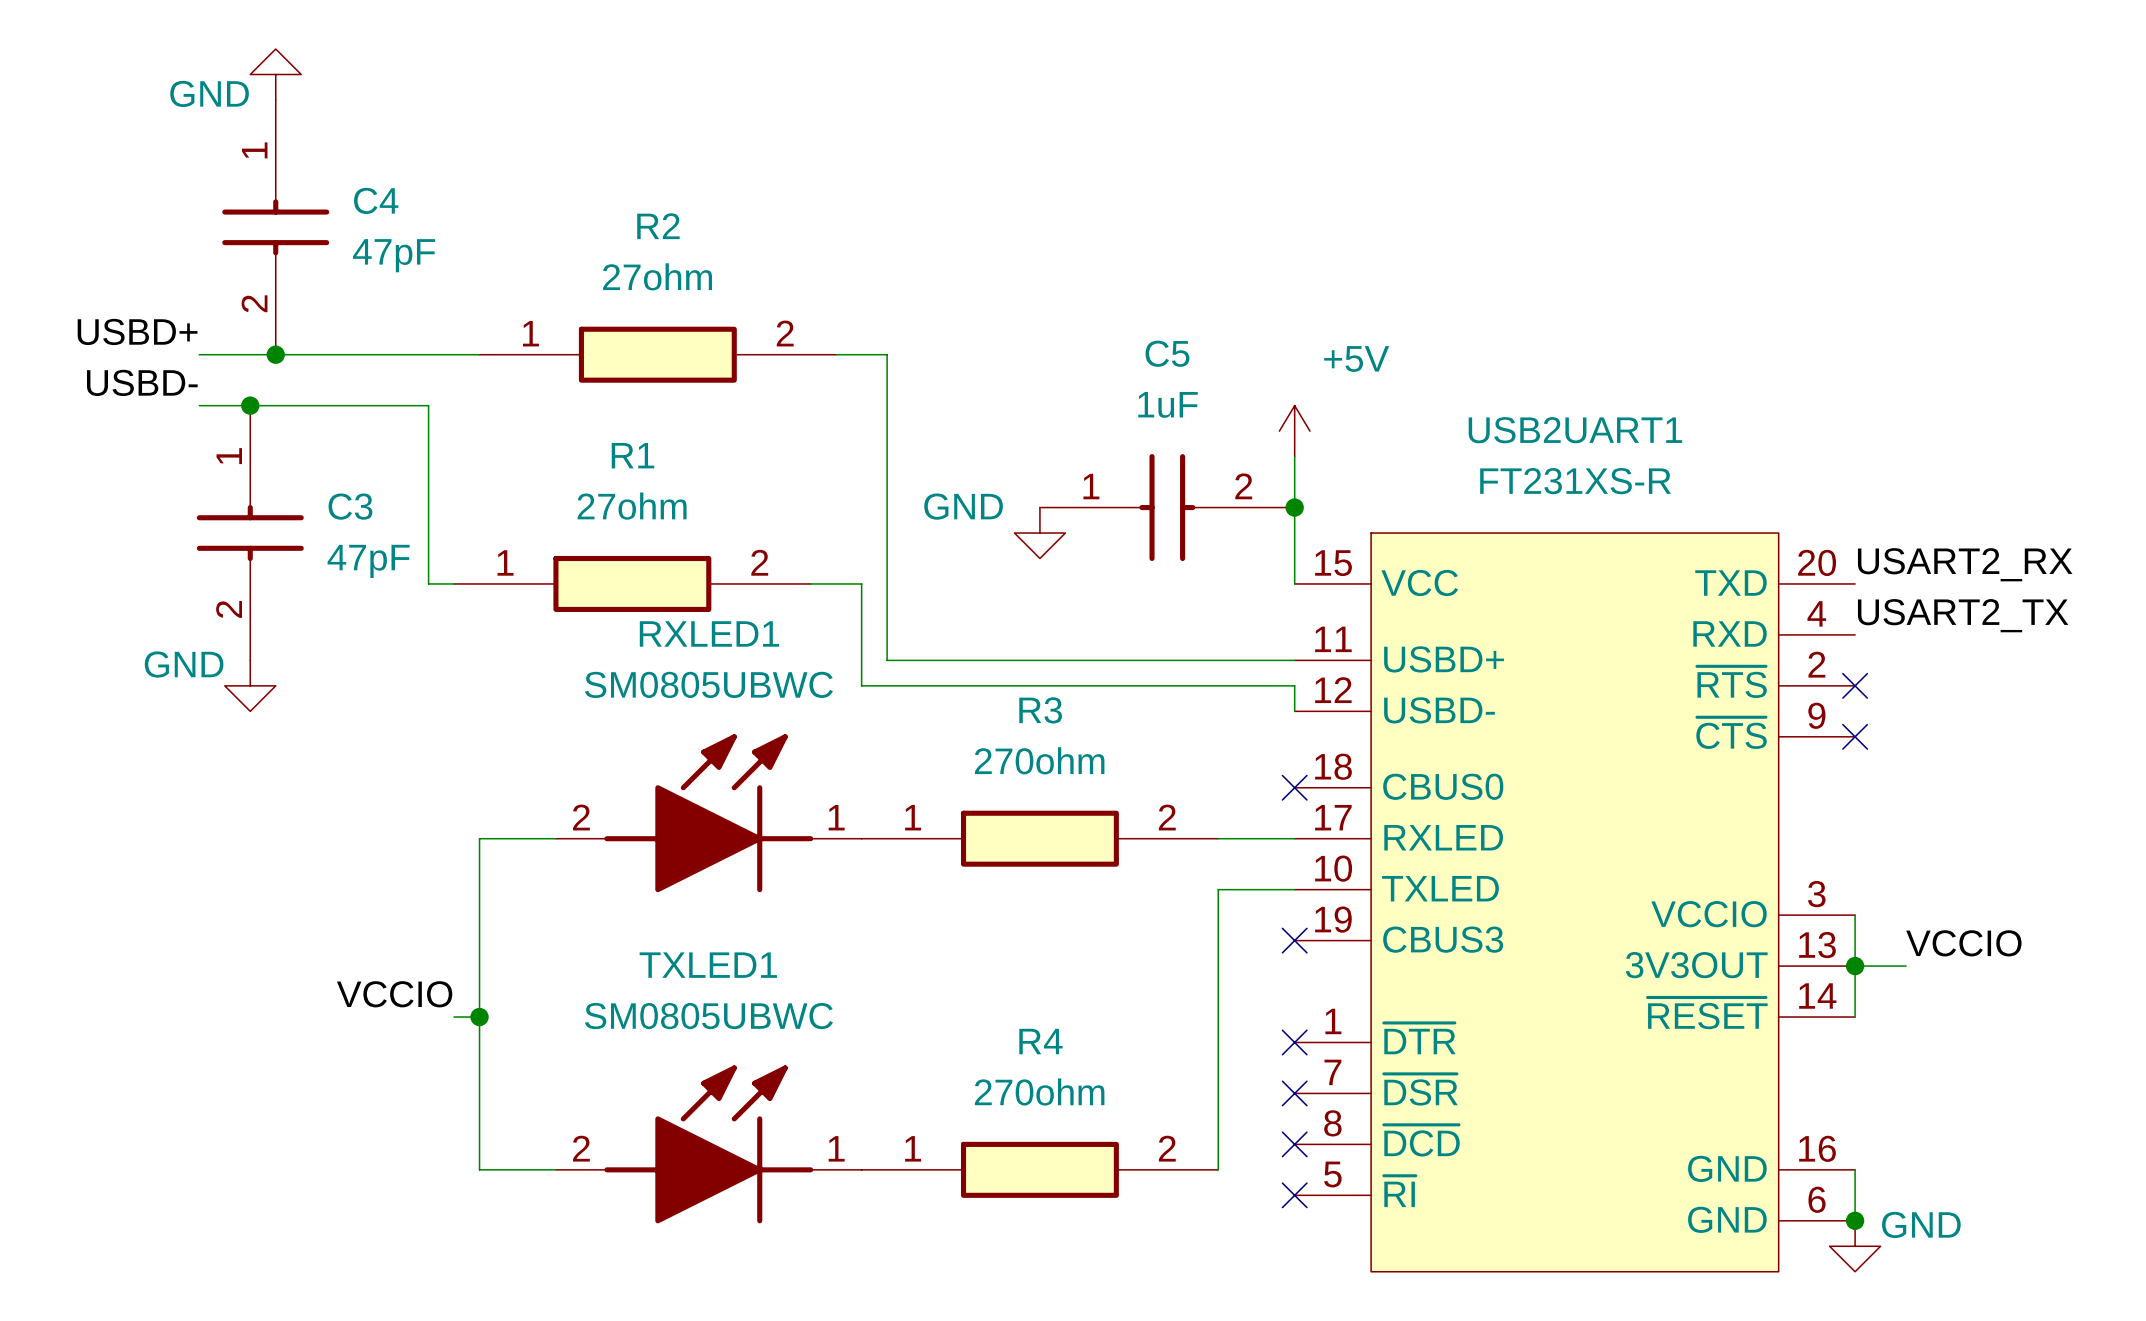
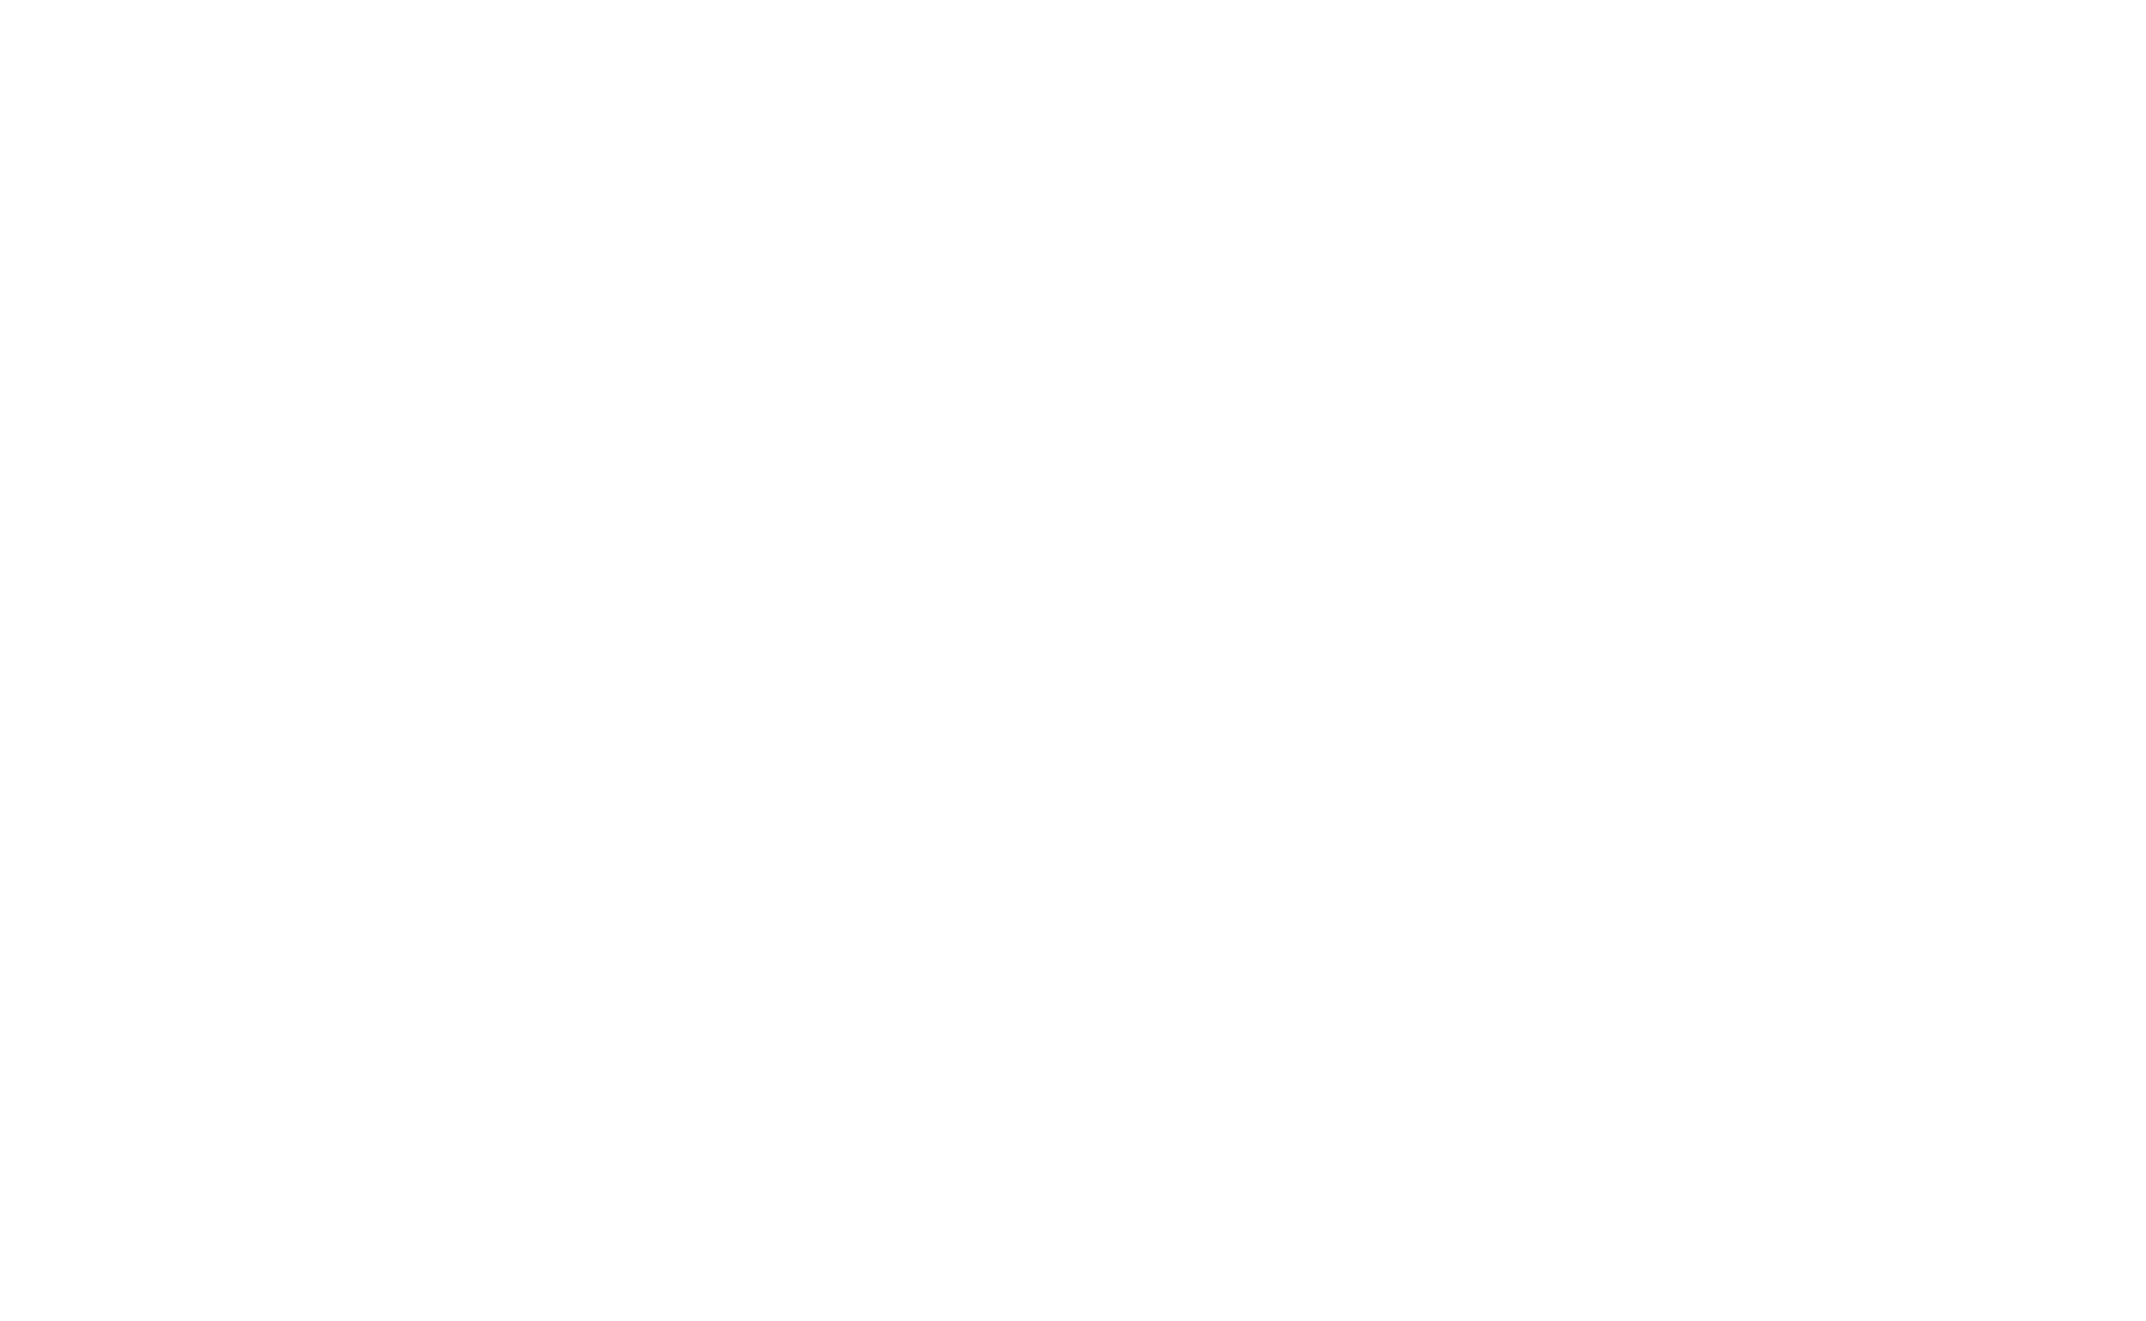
power symbol: GND (275, 74) -> none
C4: 47pF (275, 227) -> none
label: USBD+ (137, 331) -> none
wire: (199, 354) (479, 354) -> none
junction: (275, 354) -> none
R2: 27ohm (657, 354) -> none
wire: (836, 354) (887, 354) (887, 660) (1294, 660) -> none
label: USBD- (142, 382) -> none
wire: (199, 405) (428, 405) (428, 583) (454, 583) -> none
junction: (250, 405) -> none
power symbol: +5V (1294, 431) -> none
wire: (1294, 456) (1294, 583) -> none
C5: 1uF (1167, 507) -> none
junction: (1294, 507) -> none
C3: 47pF (250, 533) -> none
power symbol: GND (1039, 533) -> none
label: USART2_RX (1965, 564) -> none
R1: 27ohm (632, 583) -> none
wire: (810, 583) (861, 583) (861, 685) (1294, 685) (1294, 711) -> none
label: USART2_TX (1963, 615) -> none
power symbol: GND (250, 685) -> none
no-connect mark: (1855, 685) -> none
no-connect mark: (1855, 736) -> none
no-connect mark: (1294, 787) -> none
RXLED1: SM0805UBWC (708, 813) -> none
wire: (555, 838) (479, 838) (479, 1169) (555, 1169) -> none
R3: 270ohm (1039, 838) -> none
wire: (1218, 838) (1294, 838) -> none
wire: (1294, 889) (1218, 889) (1218, 1169) -> none
USB2UART1: FT231XS-R (1574, 902) -> none
wire: (1855, 915) (1855, 1017) -> none
no-connect mark: (1294, 940) -> none
label: VCCIO (1963, 943) -> none
wire: (1855, 966) (1906, 966) -> none
junction: (1855, 966) -> none
label: VCCIO (394, 994) -> none
wire: (454, 1017) (479, 1017) -> none
junction: (479, 1017) -> none
no-connect mark: (1294, 1042) -> none
no-connect mark: (1294, 1093) -> none
TXLED1: SM0805UBWC (708, 1144) -> none
no-connect mark: (1294, 1144) -> none
R4: 270ohm (1039, 1169) -> none
wire: (1855, 1169) (1855, 1220) -> none
no-connect mark: (1294, 1195) -> none
junction: (1855, 1220) -> none
power symbol: GND (1855, 1246) -> none

